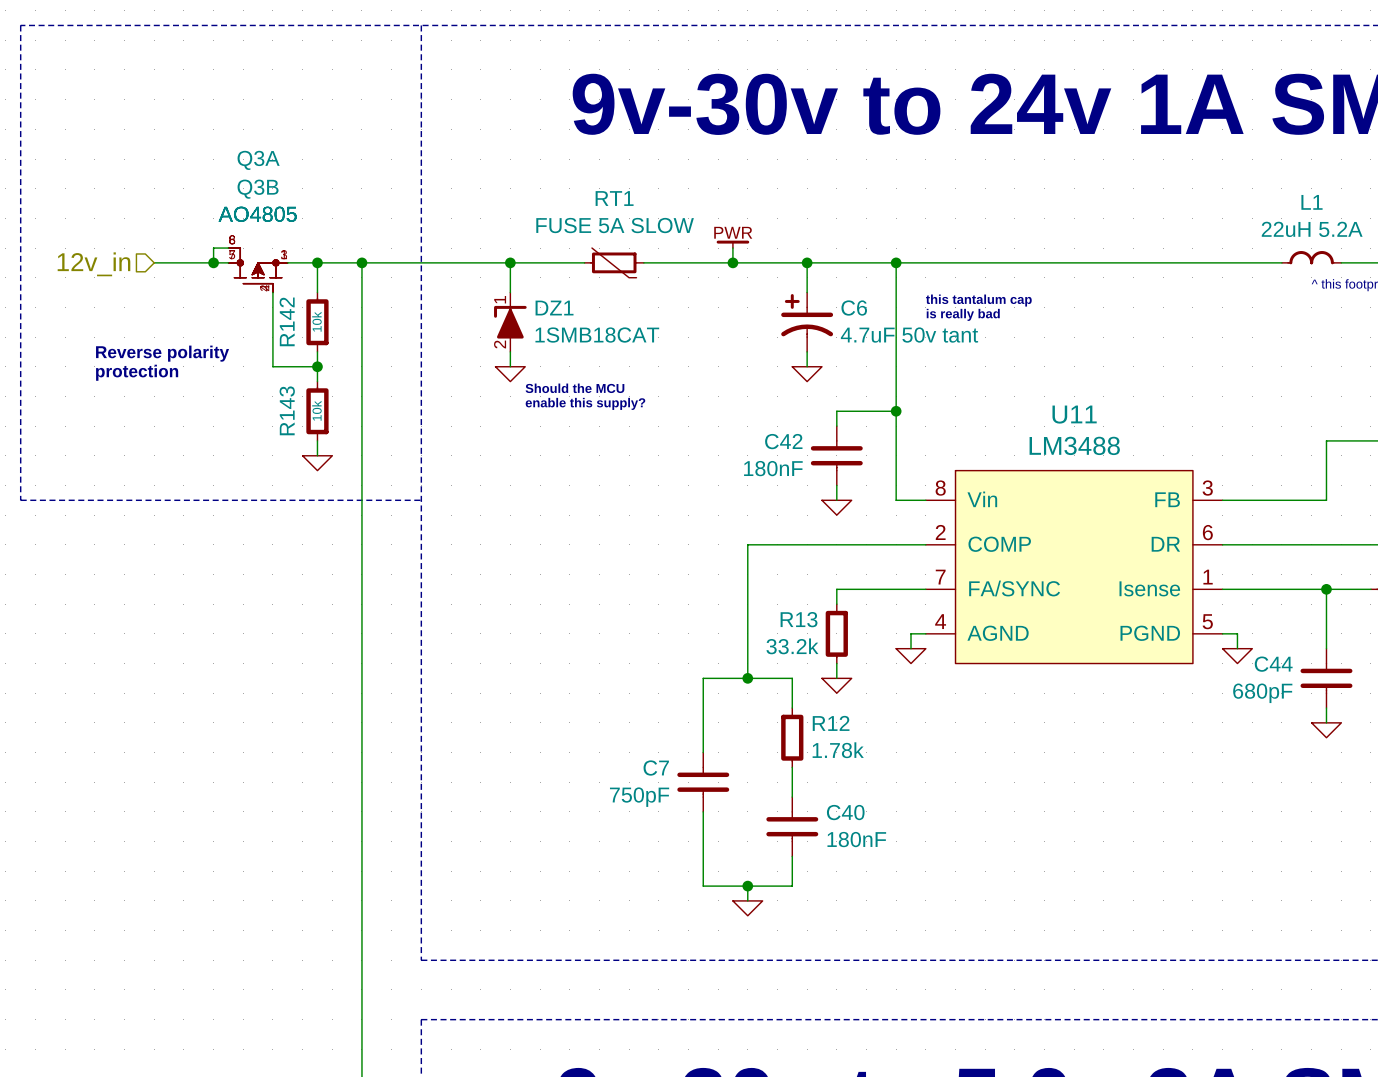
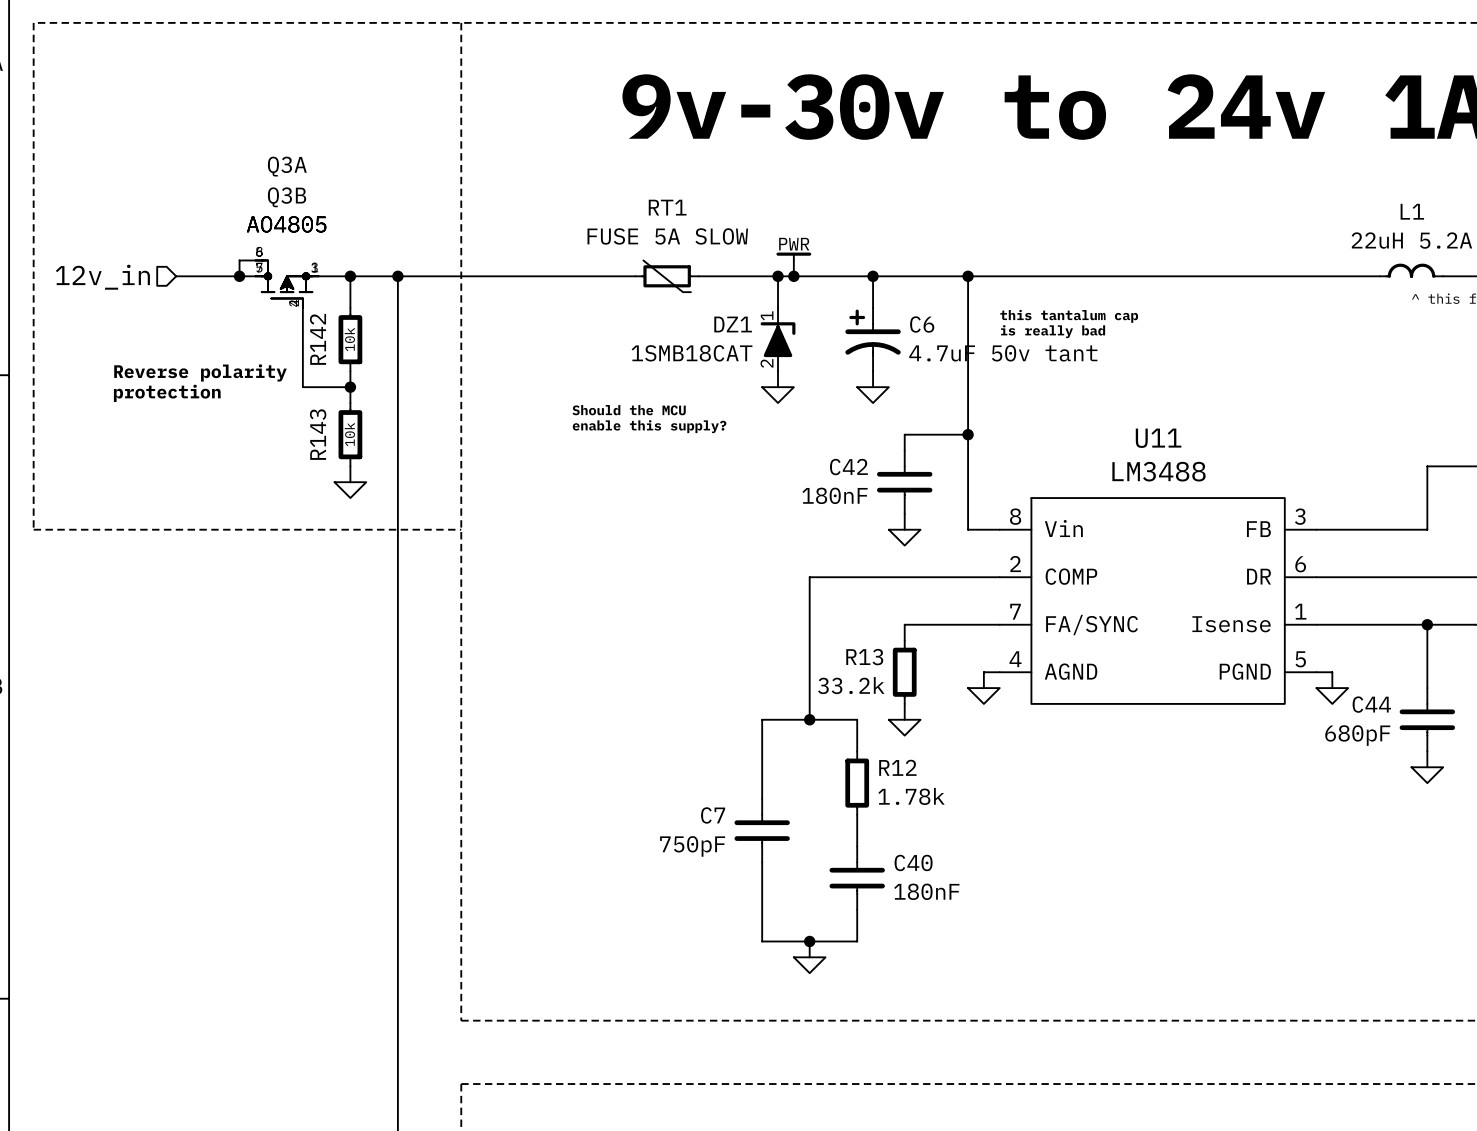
wire: (510, 262) (510, 292) -> (778, 276) (778, 307)
junction: (510, 262) -> none
junction: none -> (778, 276)
DZ1 flip: as is (510, 322) -> left-right (778, 339)
DZ1 position: (510, 322) -> (778, 339)
wire: (510, 351) (510, 366) -> (778, 371) (778, 387)
power symbol position: (510, 374) -> (778, 395)

